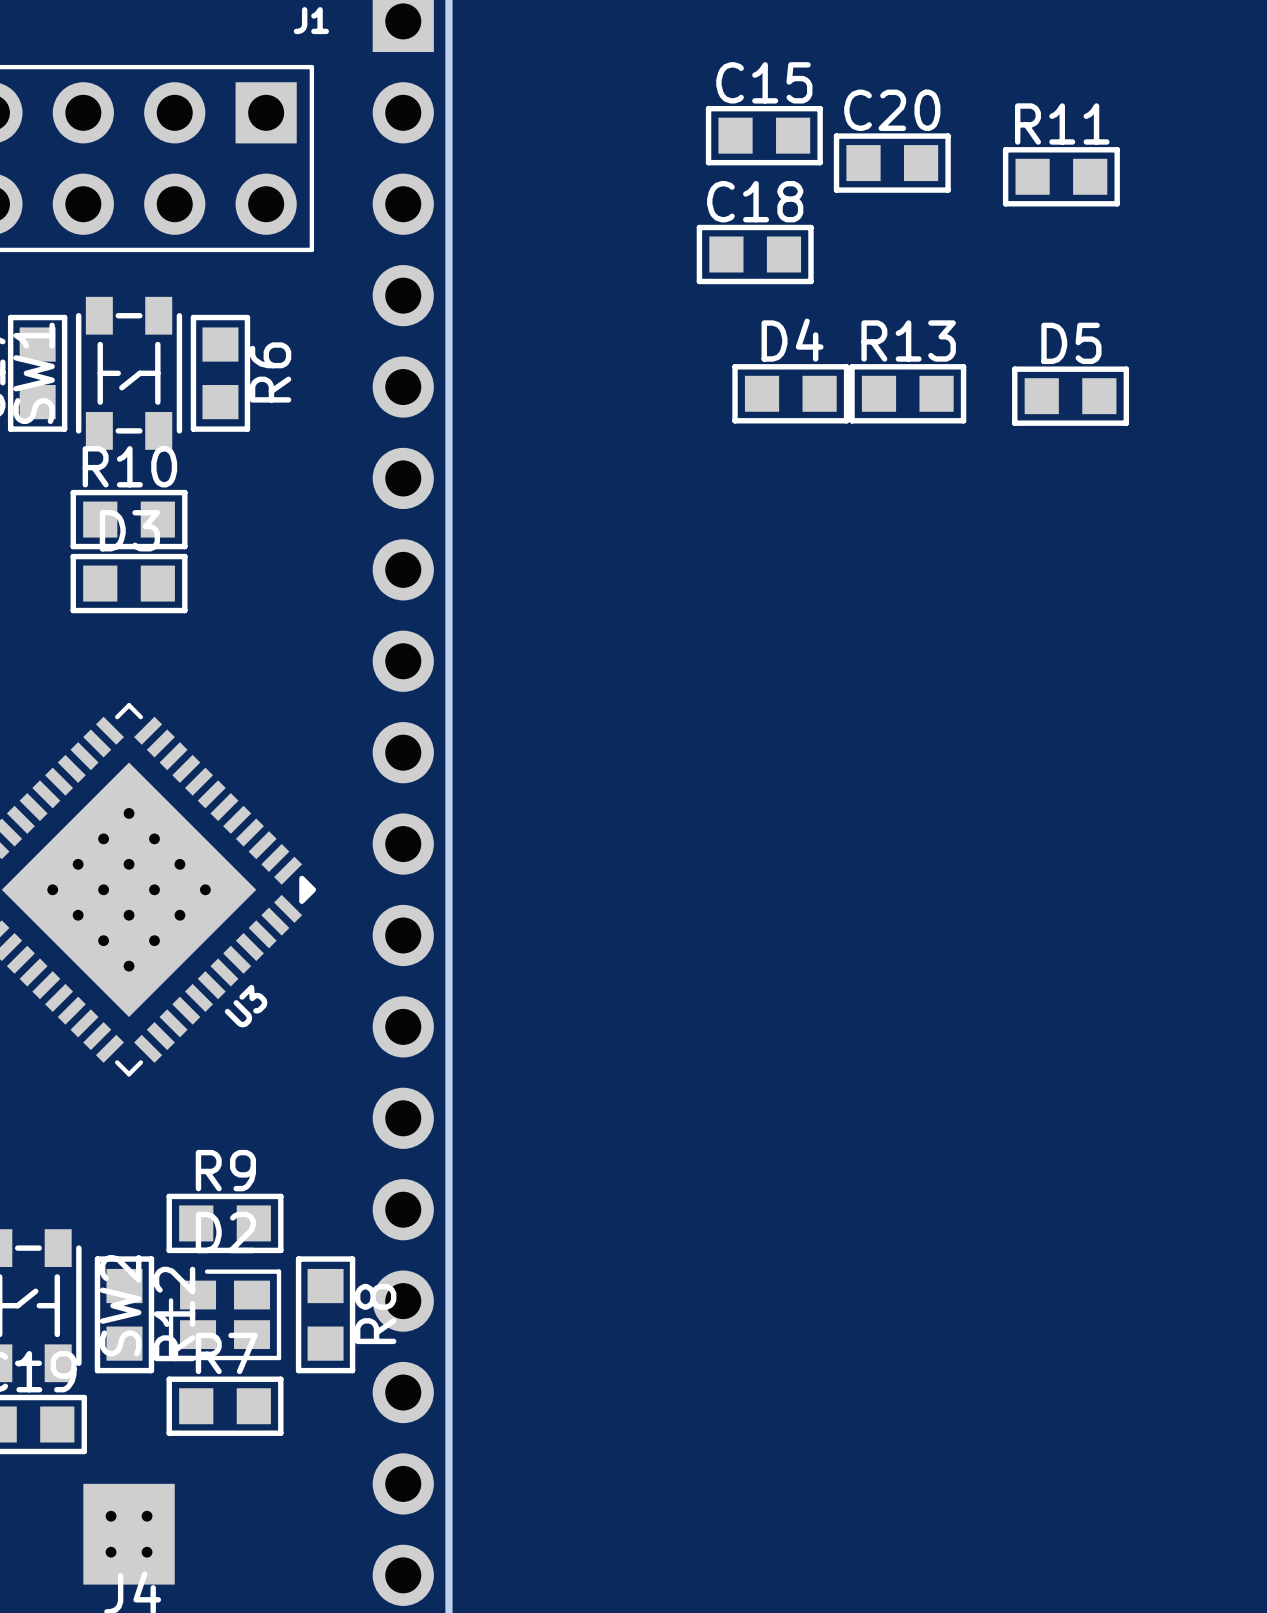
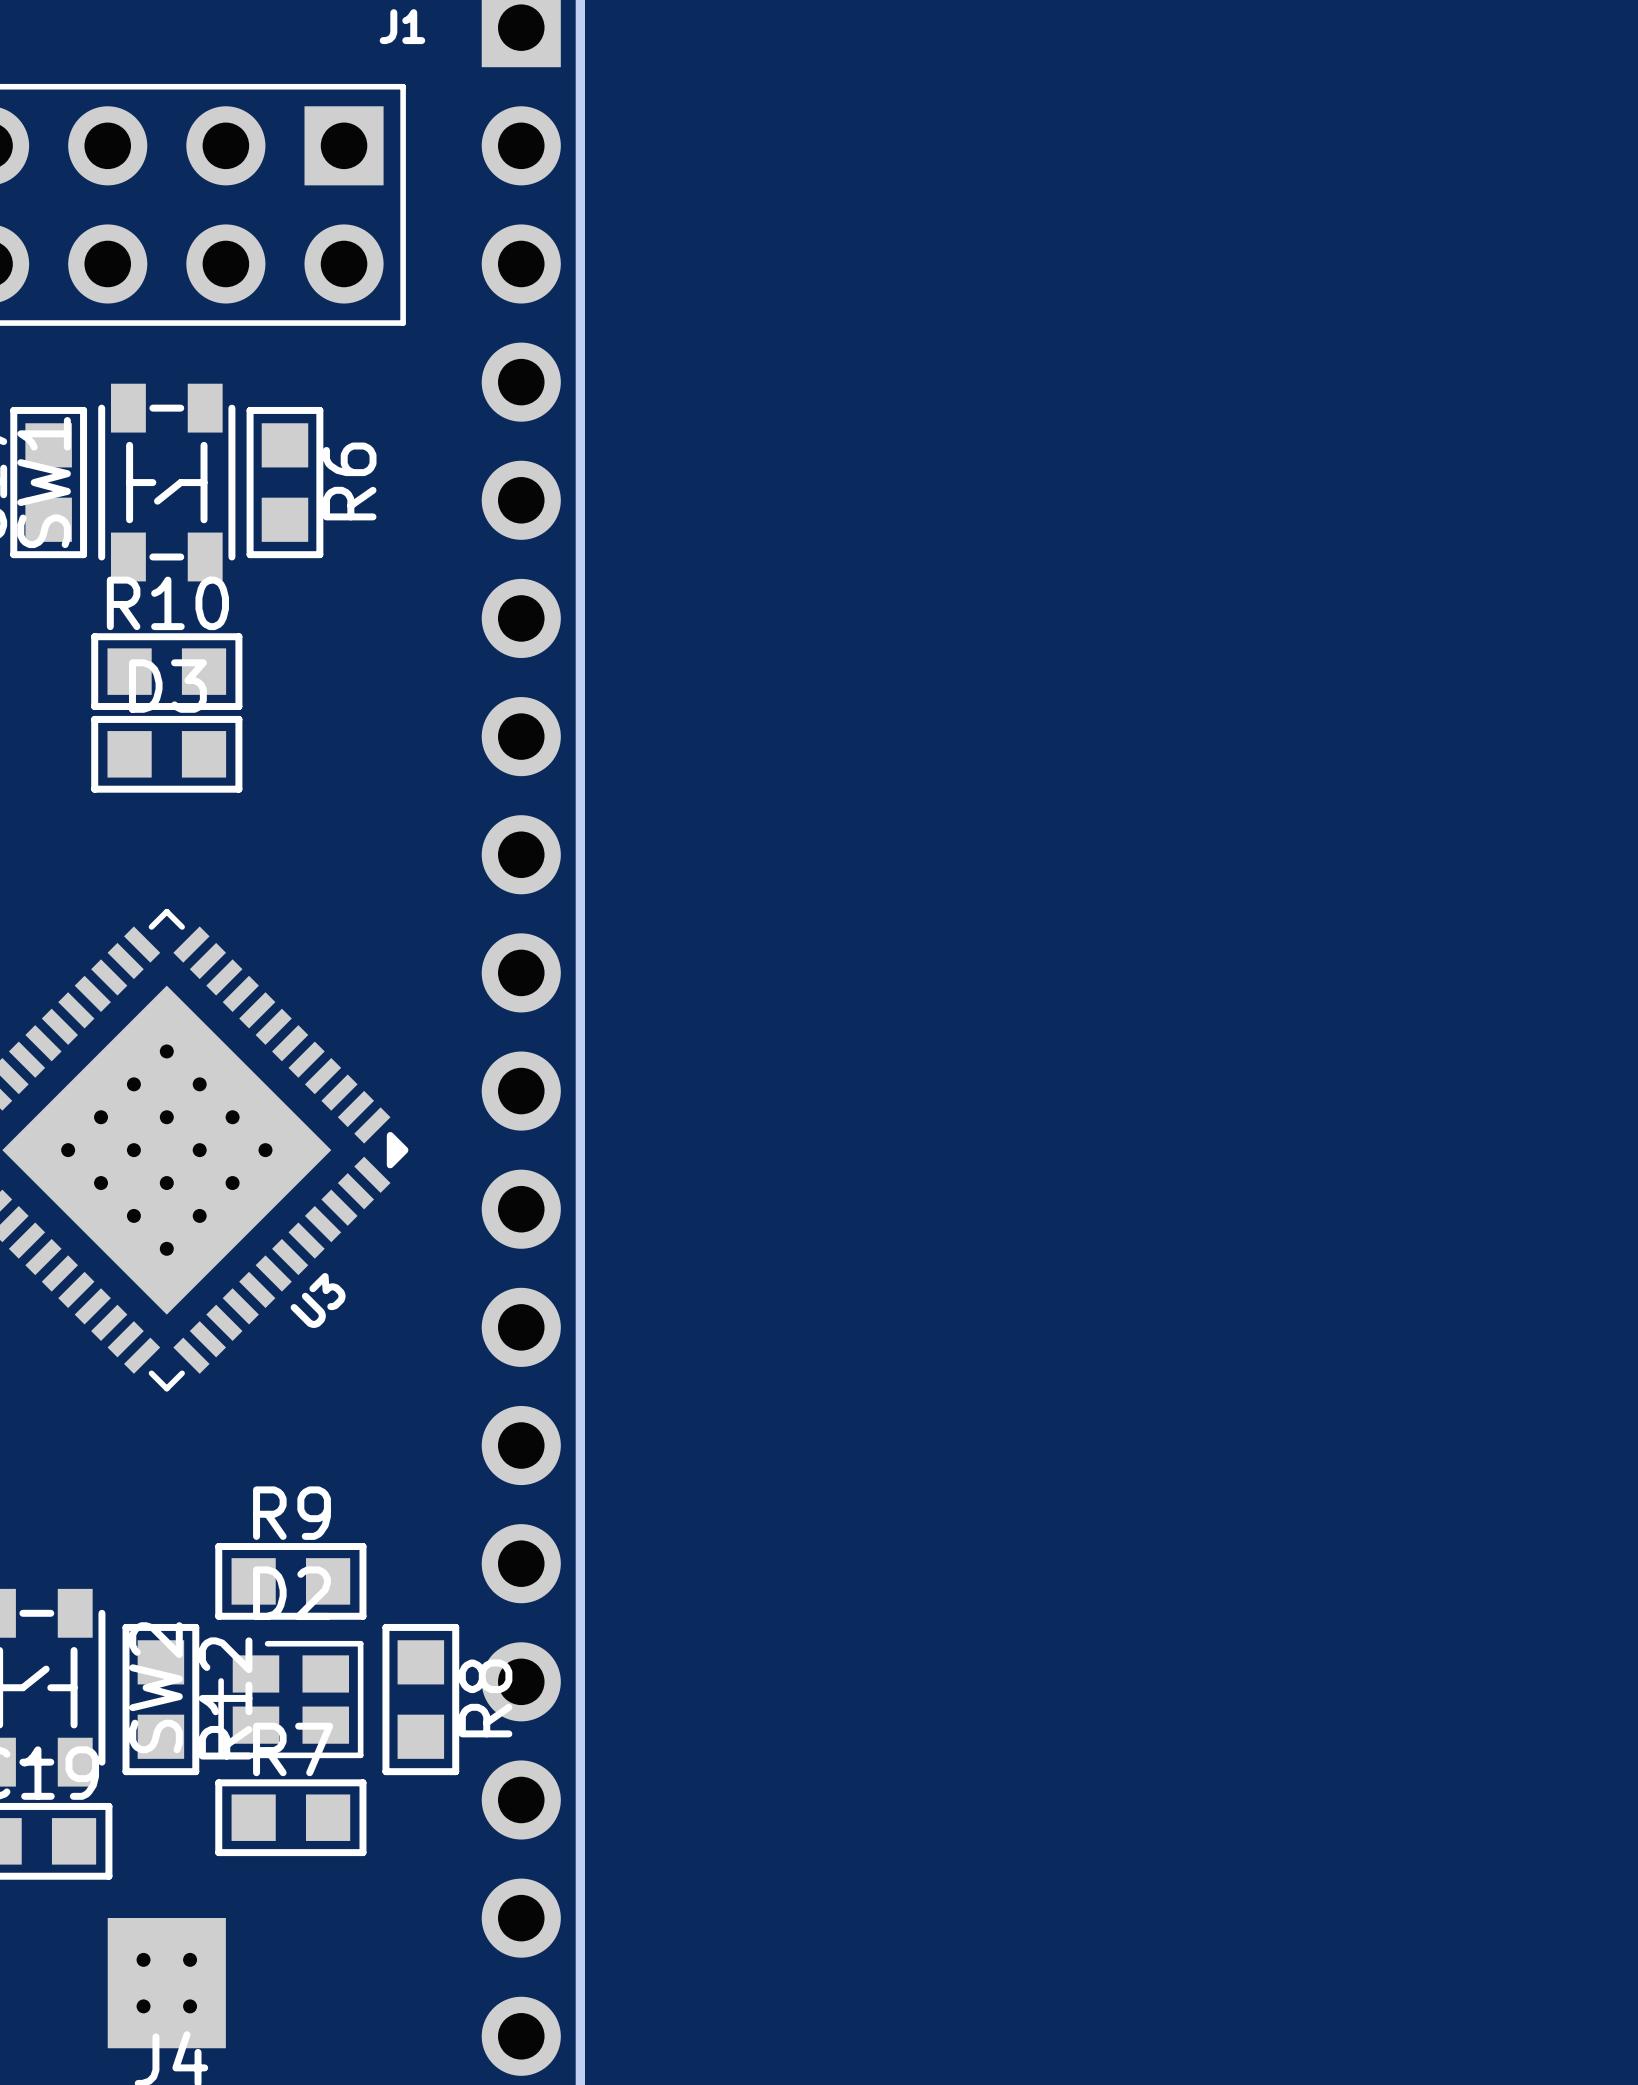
C15: (764, 135) -> none
C20: (892, 163) -> none
R11: (1061, 176) -> none
C18: (755, 254) -> none
D4: (790, 393) -> none
R13: (907, 393) -> none
D5: (1070, 396) -> none

